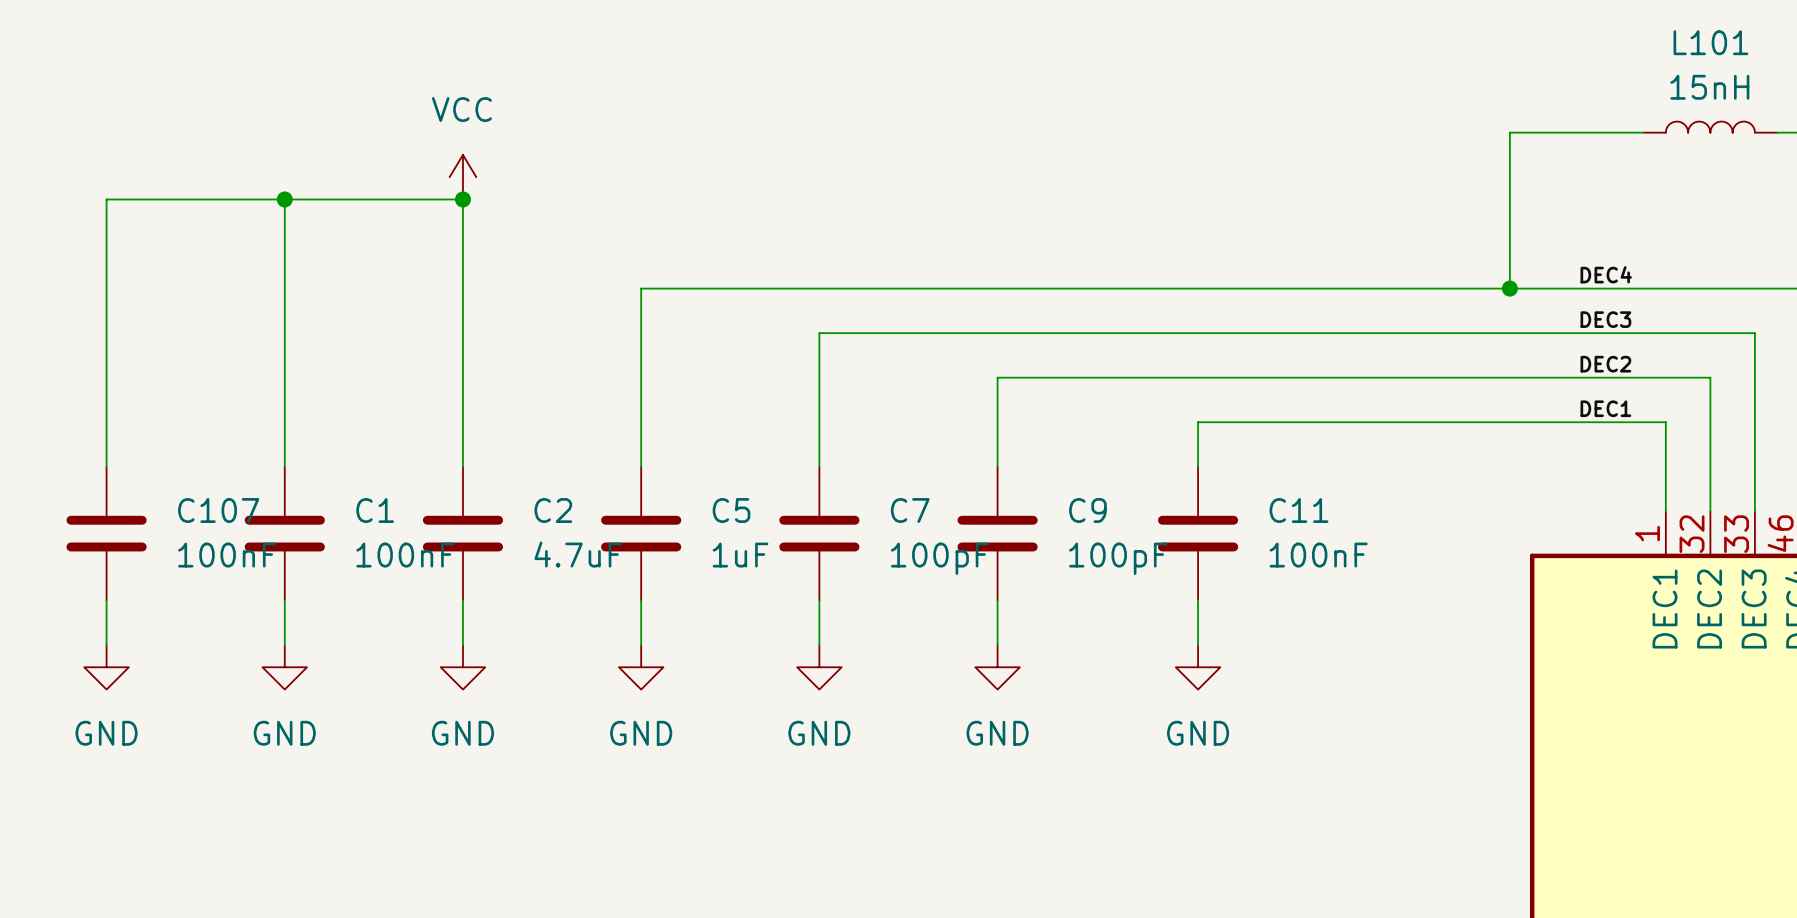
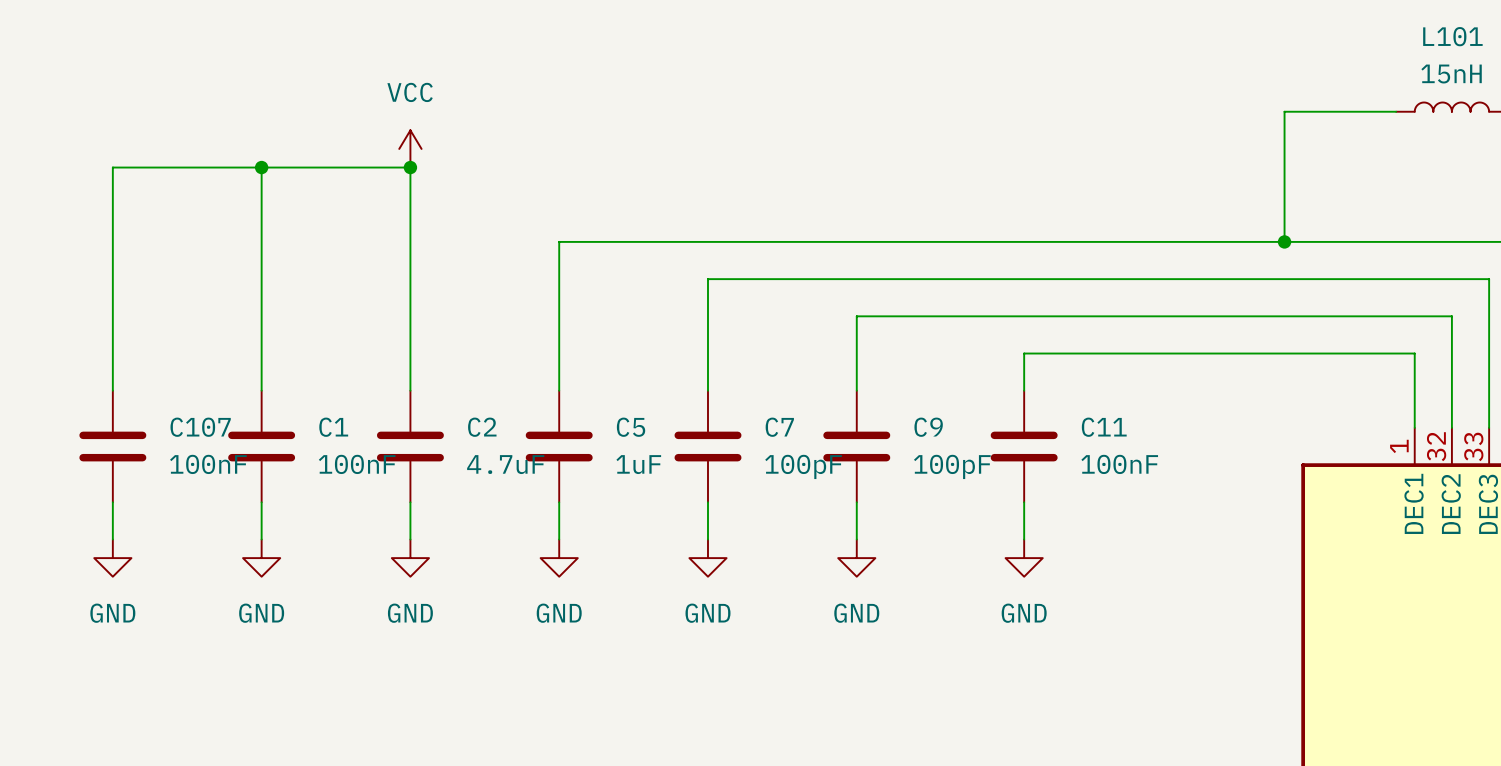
label: DEC4 (1606, 274) -> none
label: DEC3 (1605, 319) -> none
label: DEC2 (1605, 364) -> none
label: DEC1 (1605, 408) -> none

